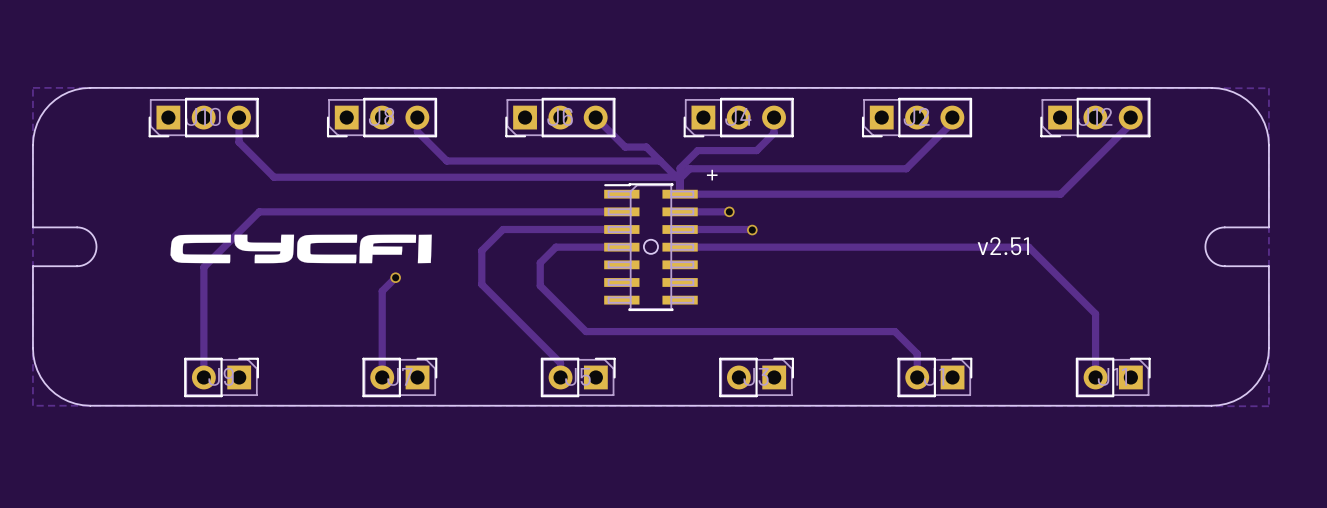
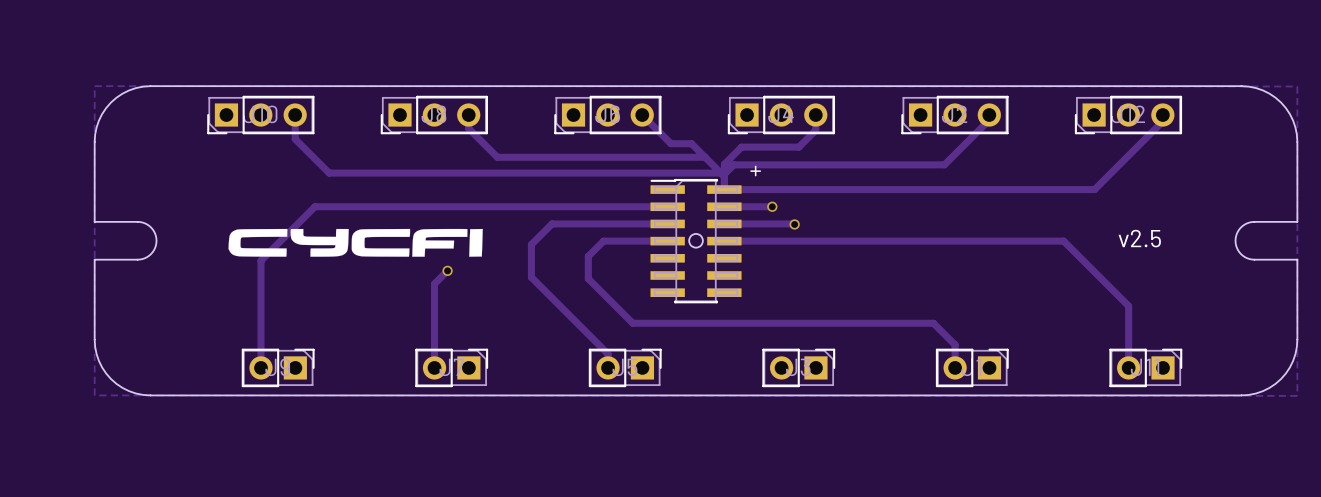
text: none -> v2.5 (1139, 238)
text: v2.51 (1003, 246) -> none

